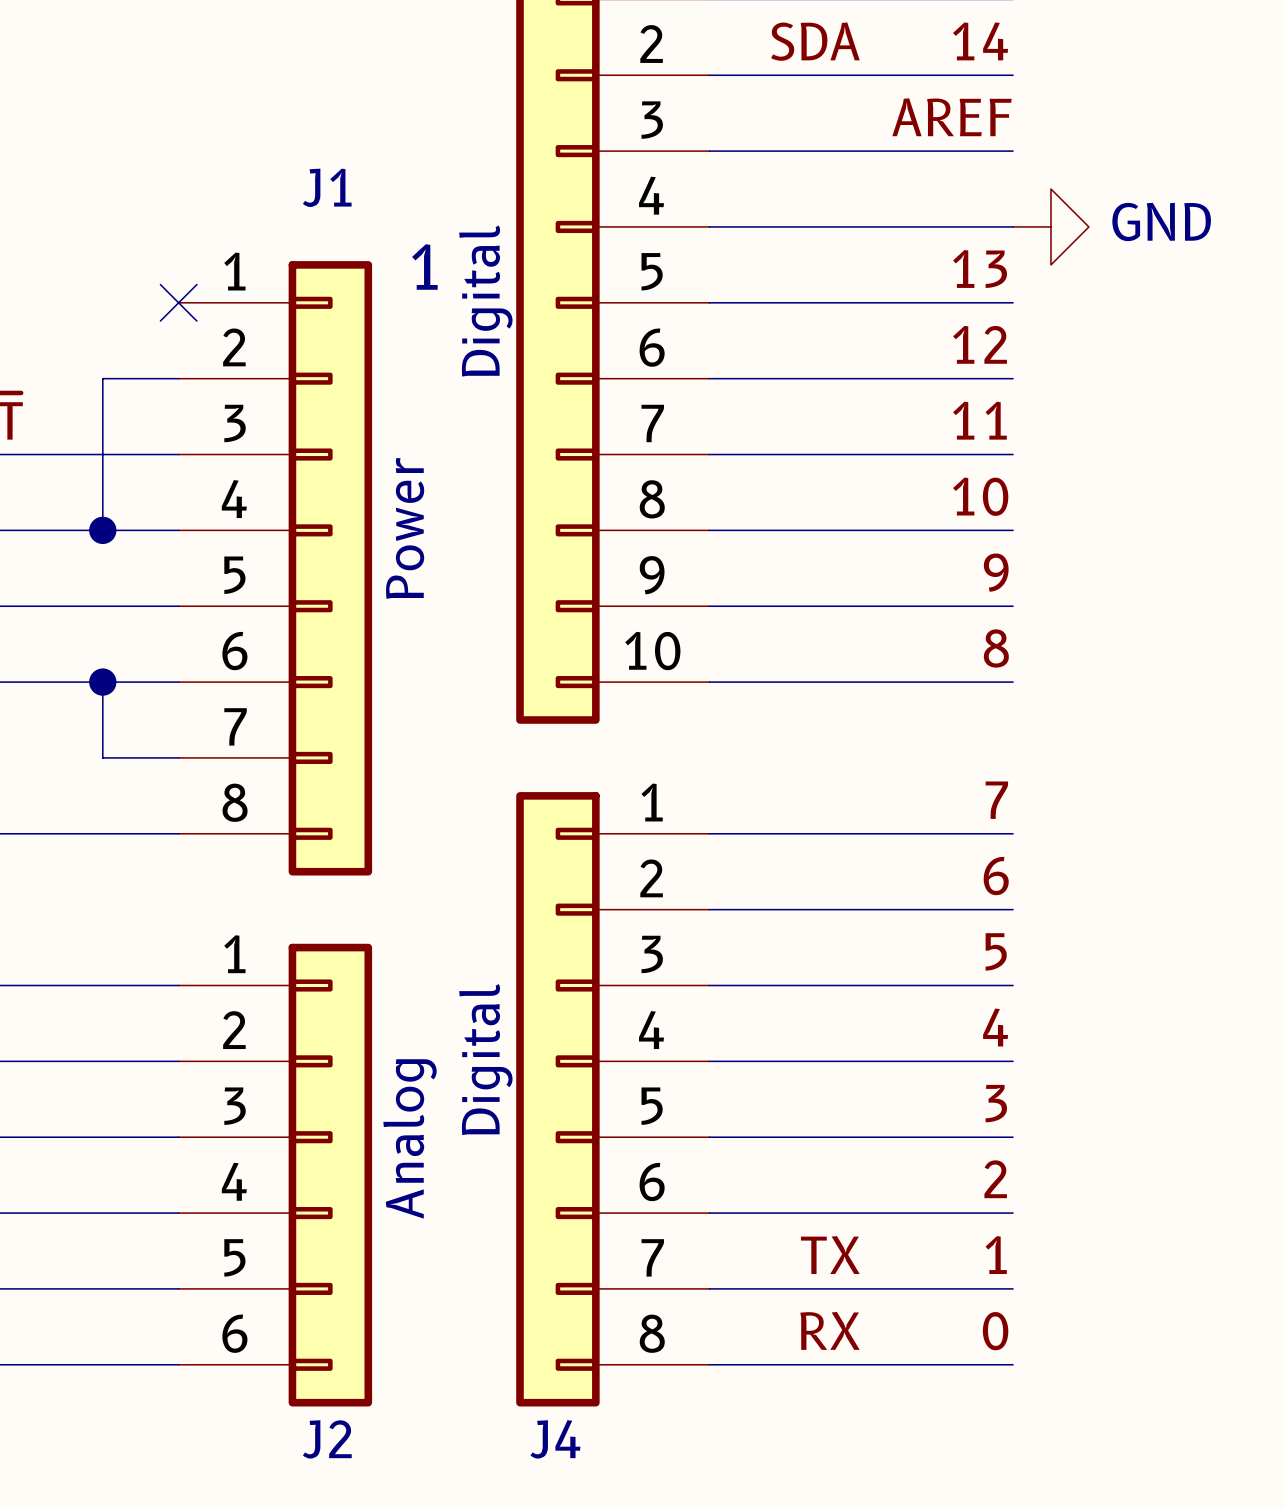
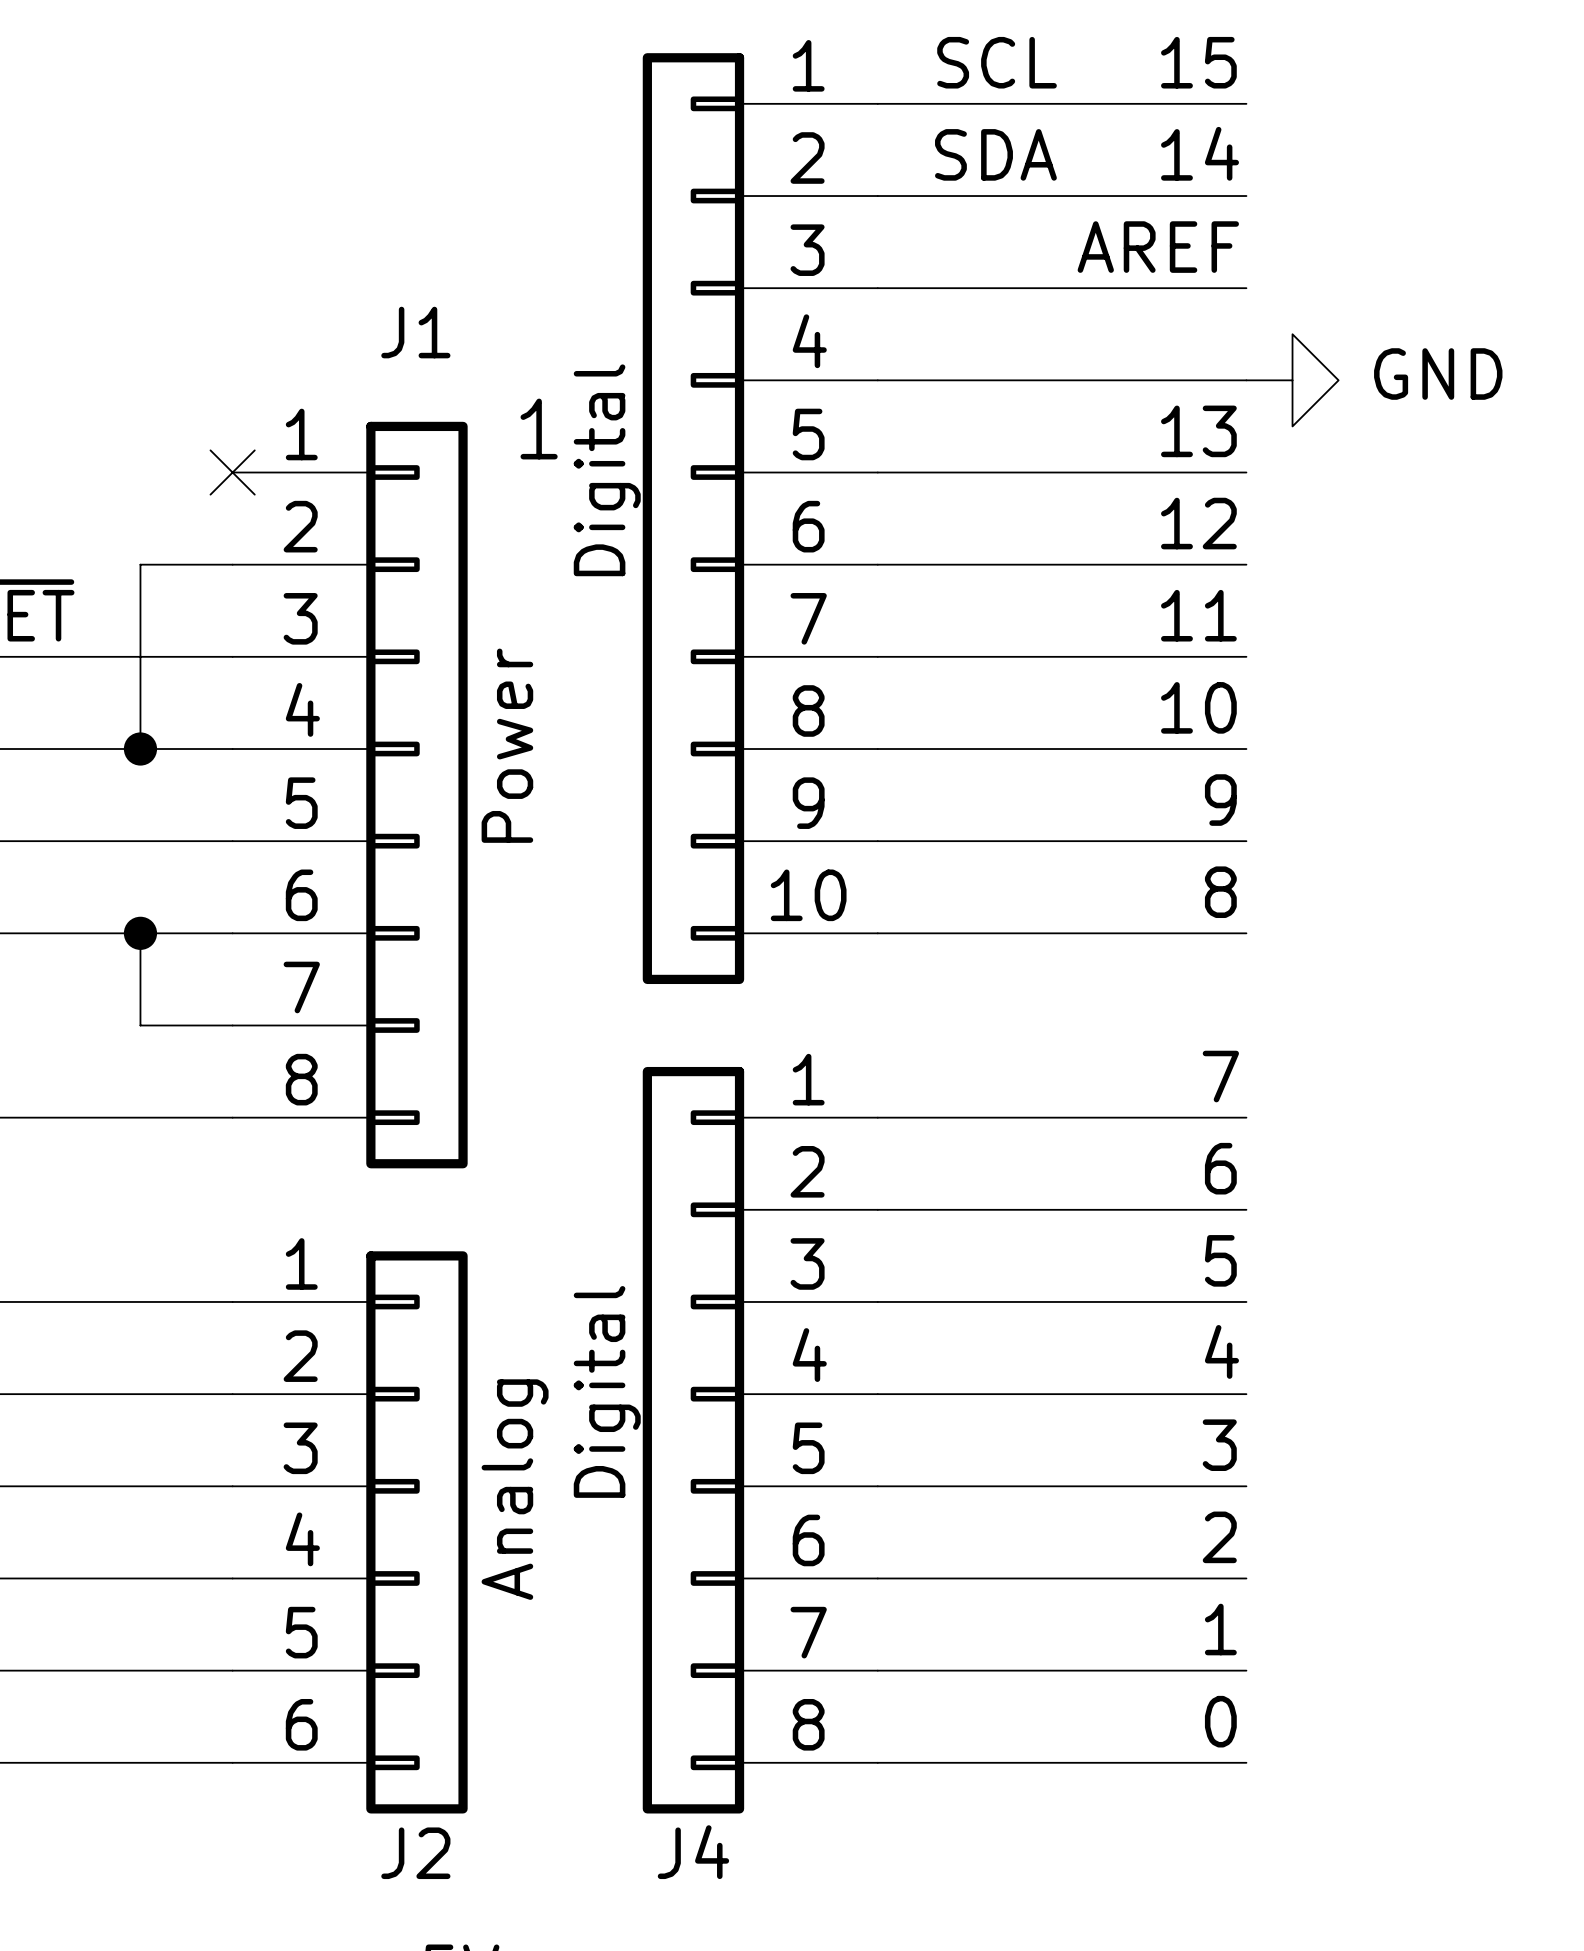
label: TX (830, 1255) -> none
label: RX (830, 1330) -> none

